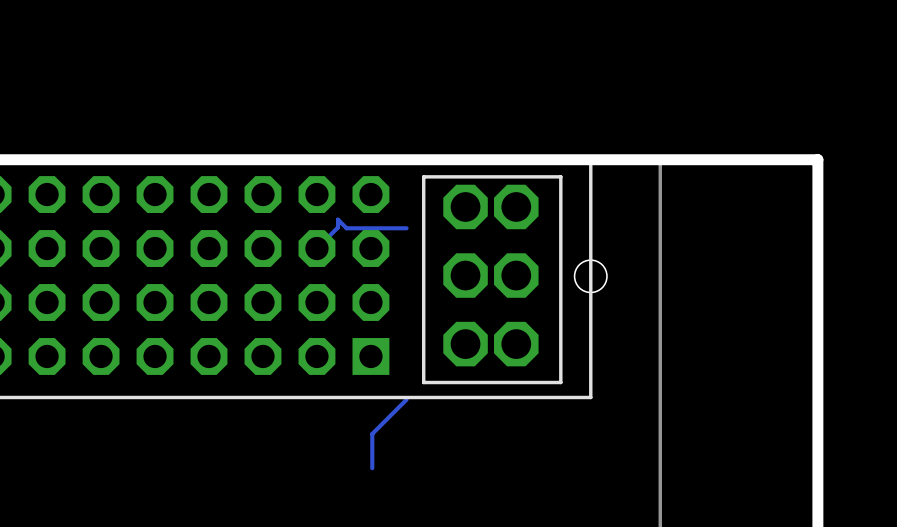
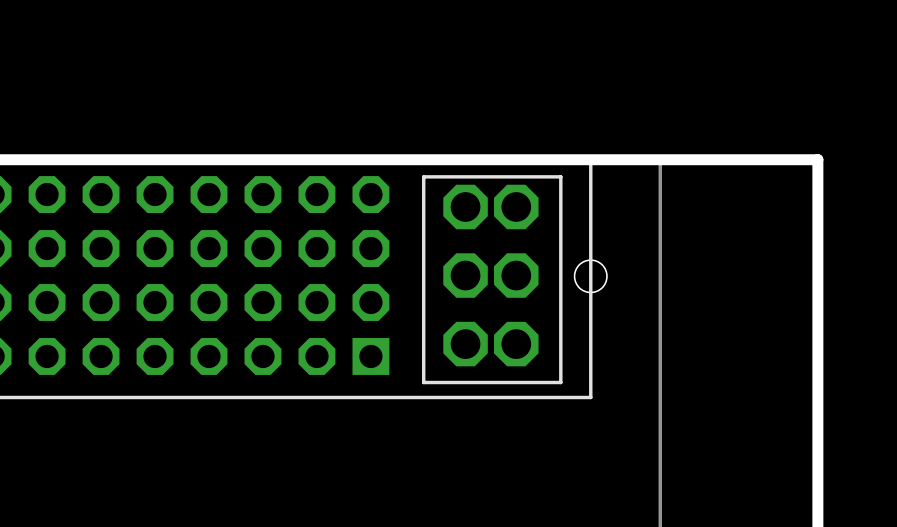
bottom track: (406, 228) (346, 228) (338, 219) (338, 227) (316, 248) -> none
bottom track: (406, 399) (372, 433) (372, 468) -> none

